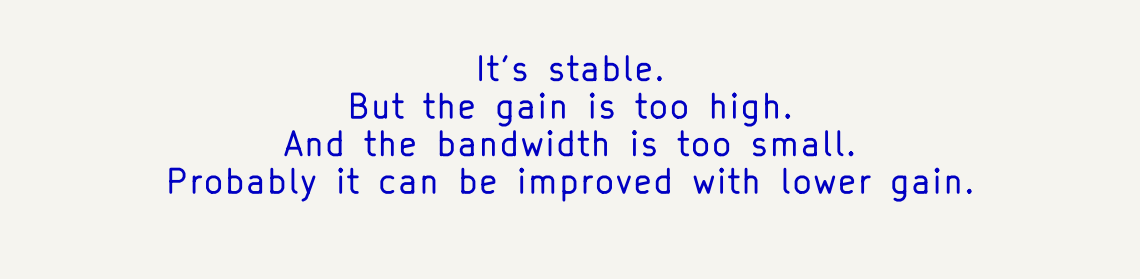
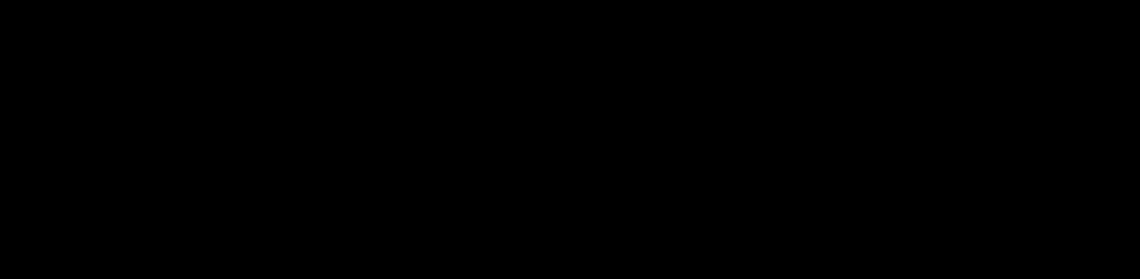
text: It's stable. (570, 68) -> none
text: But the gain is too high. (570, 109) -> none
text: And the bandwidth is too small. (568, 143) -> none
text: Probably it can be improved with lower gain. (570, 184) -> none

